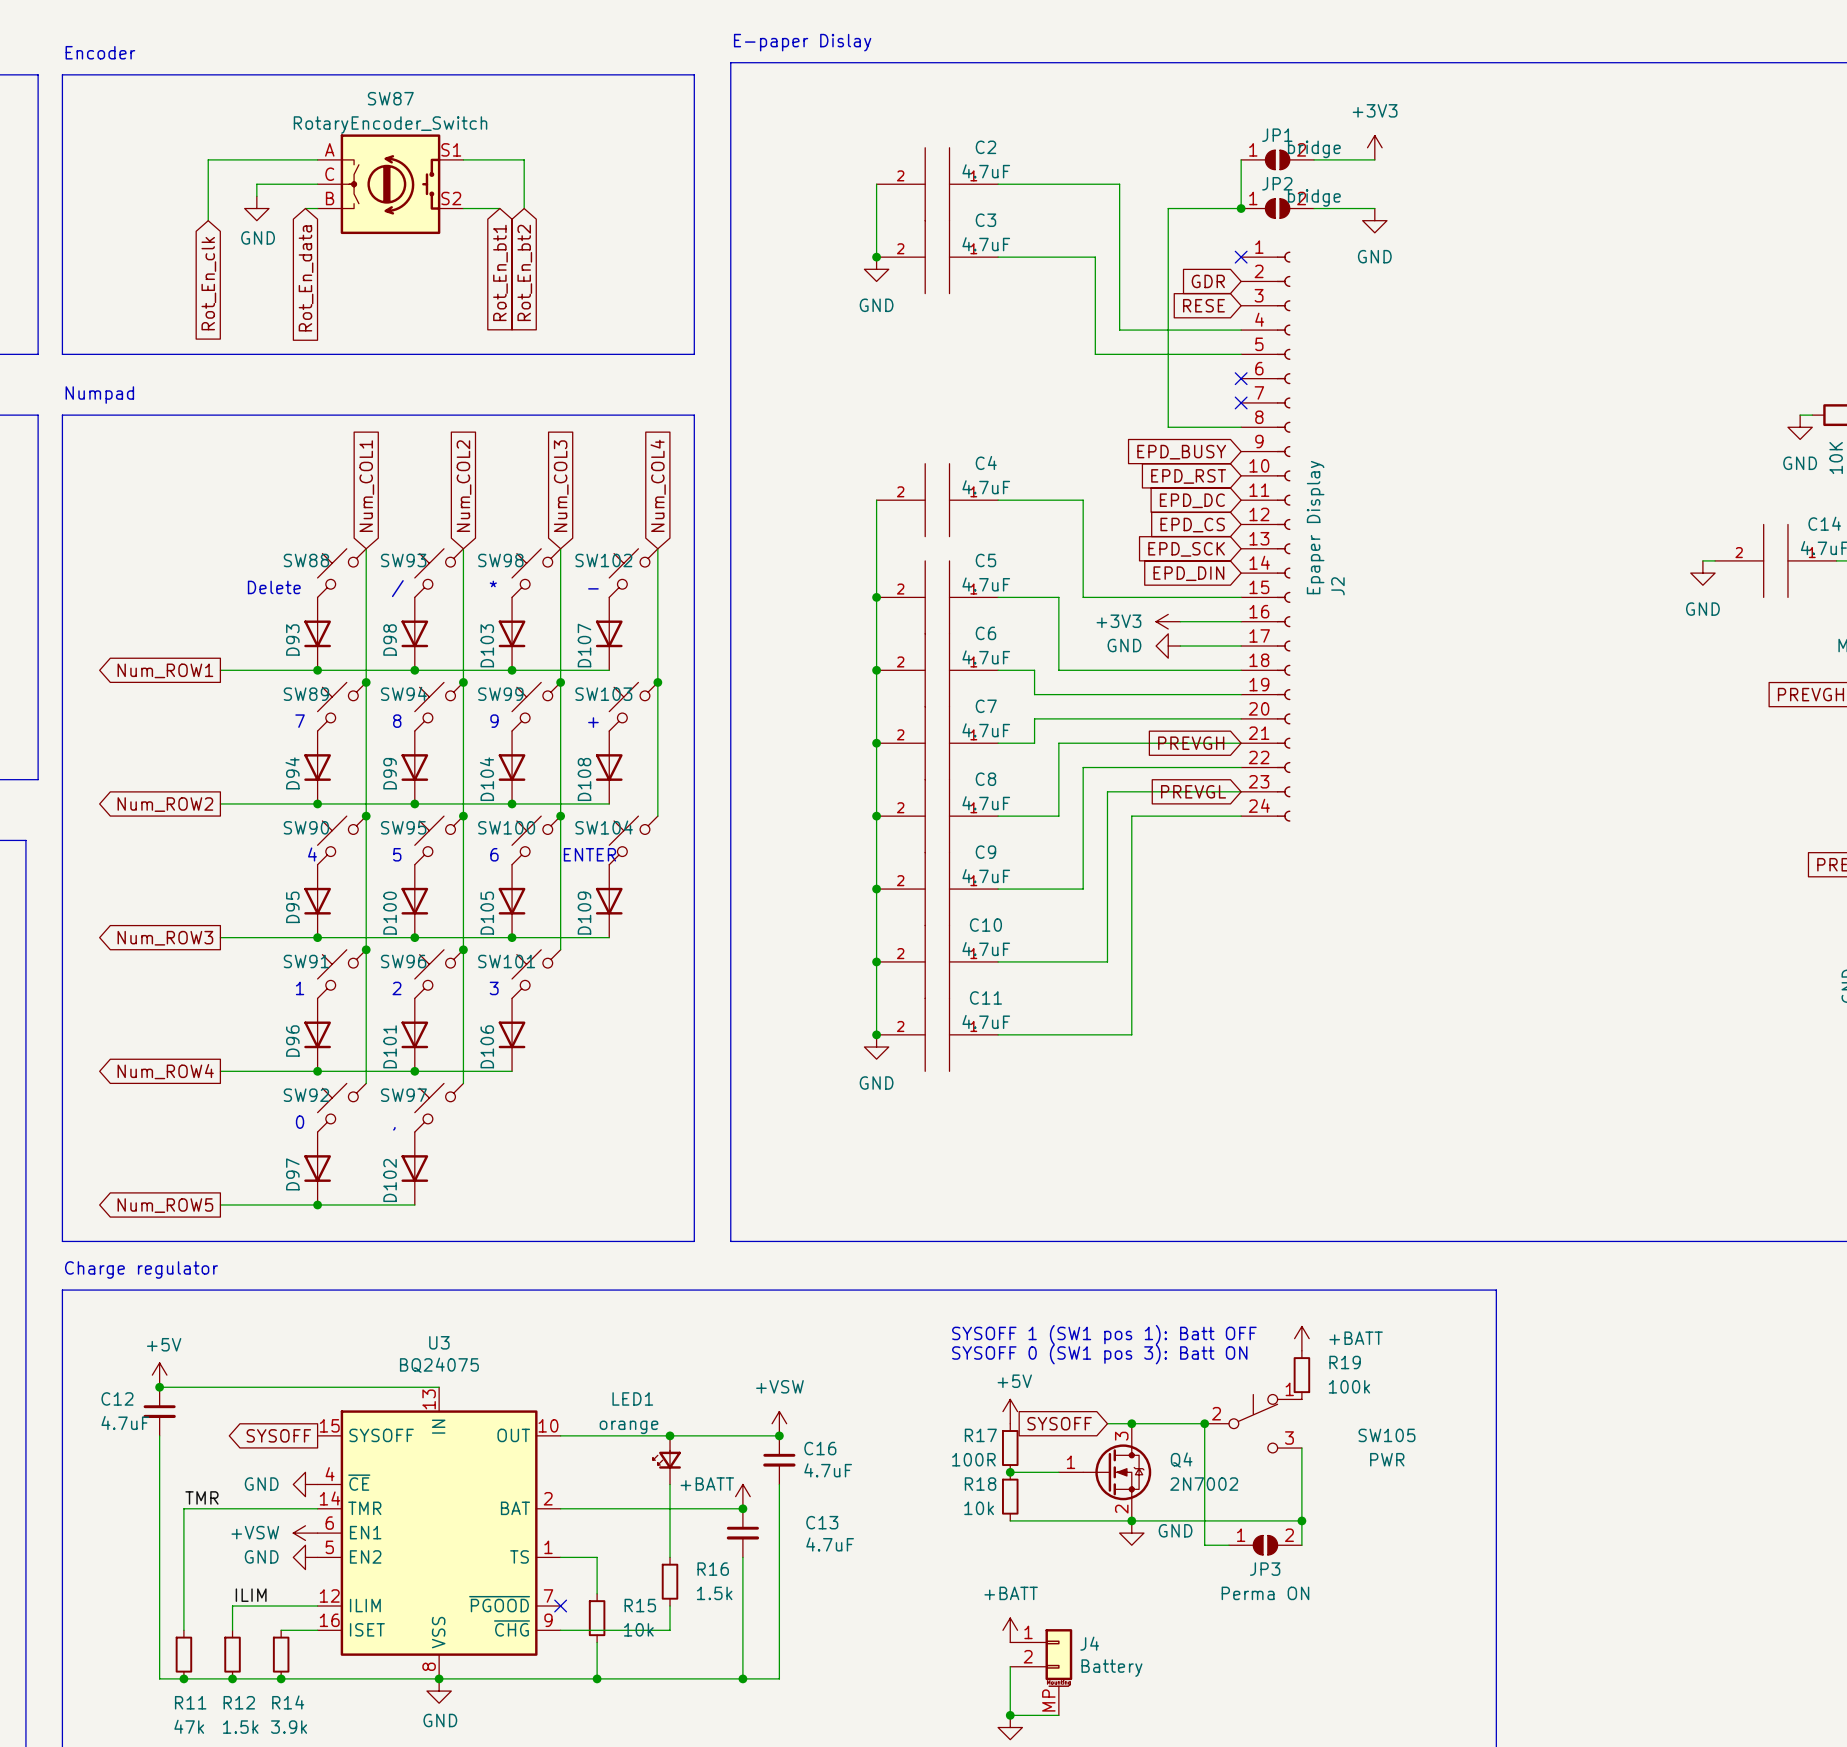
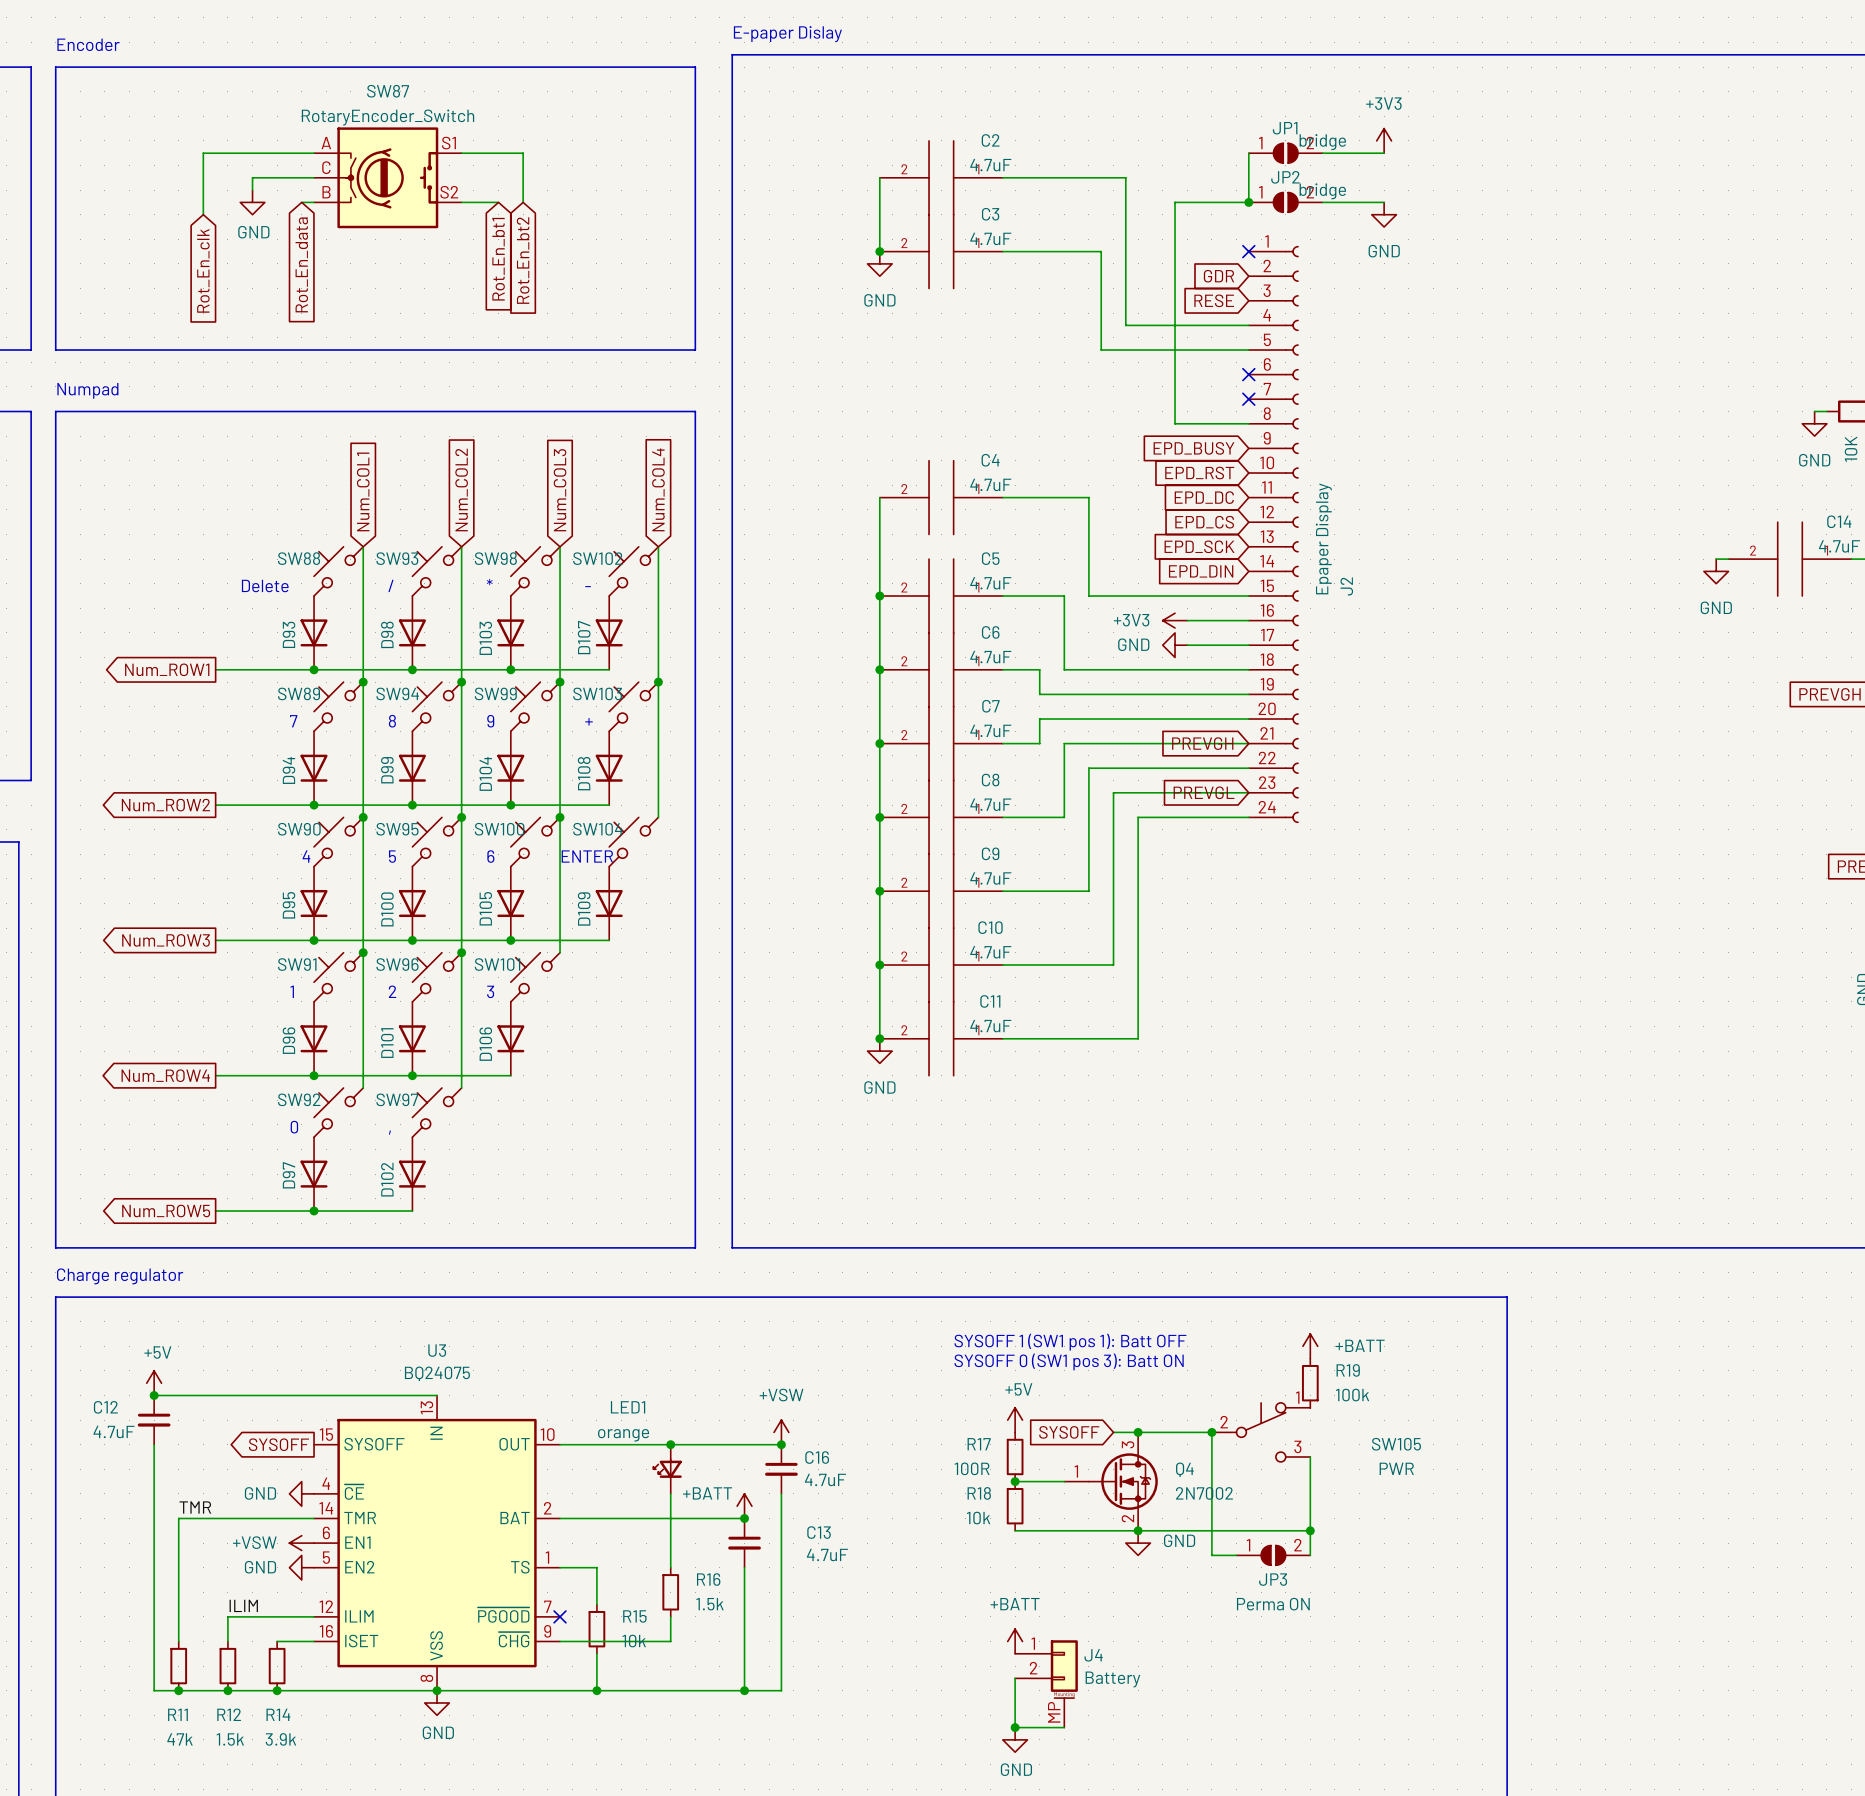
SW87 symbol: [317, 134, 464, 235] -> [314, 127, 462, 229]

